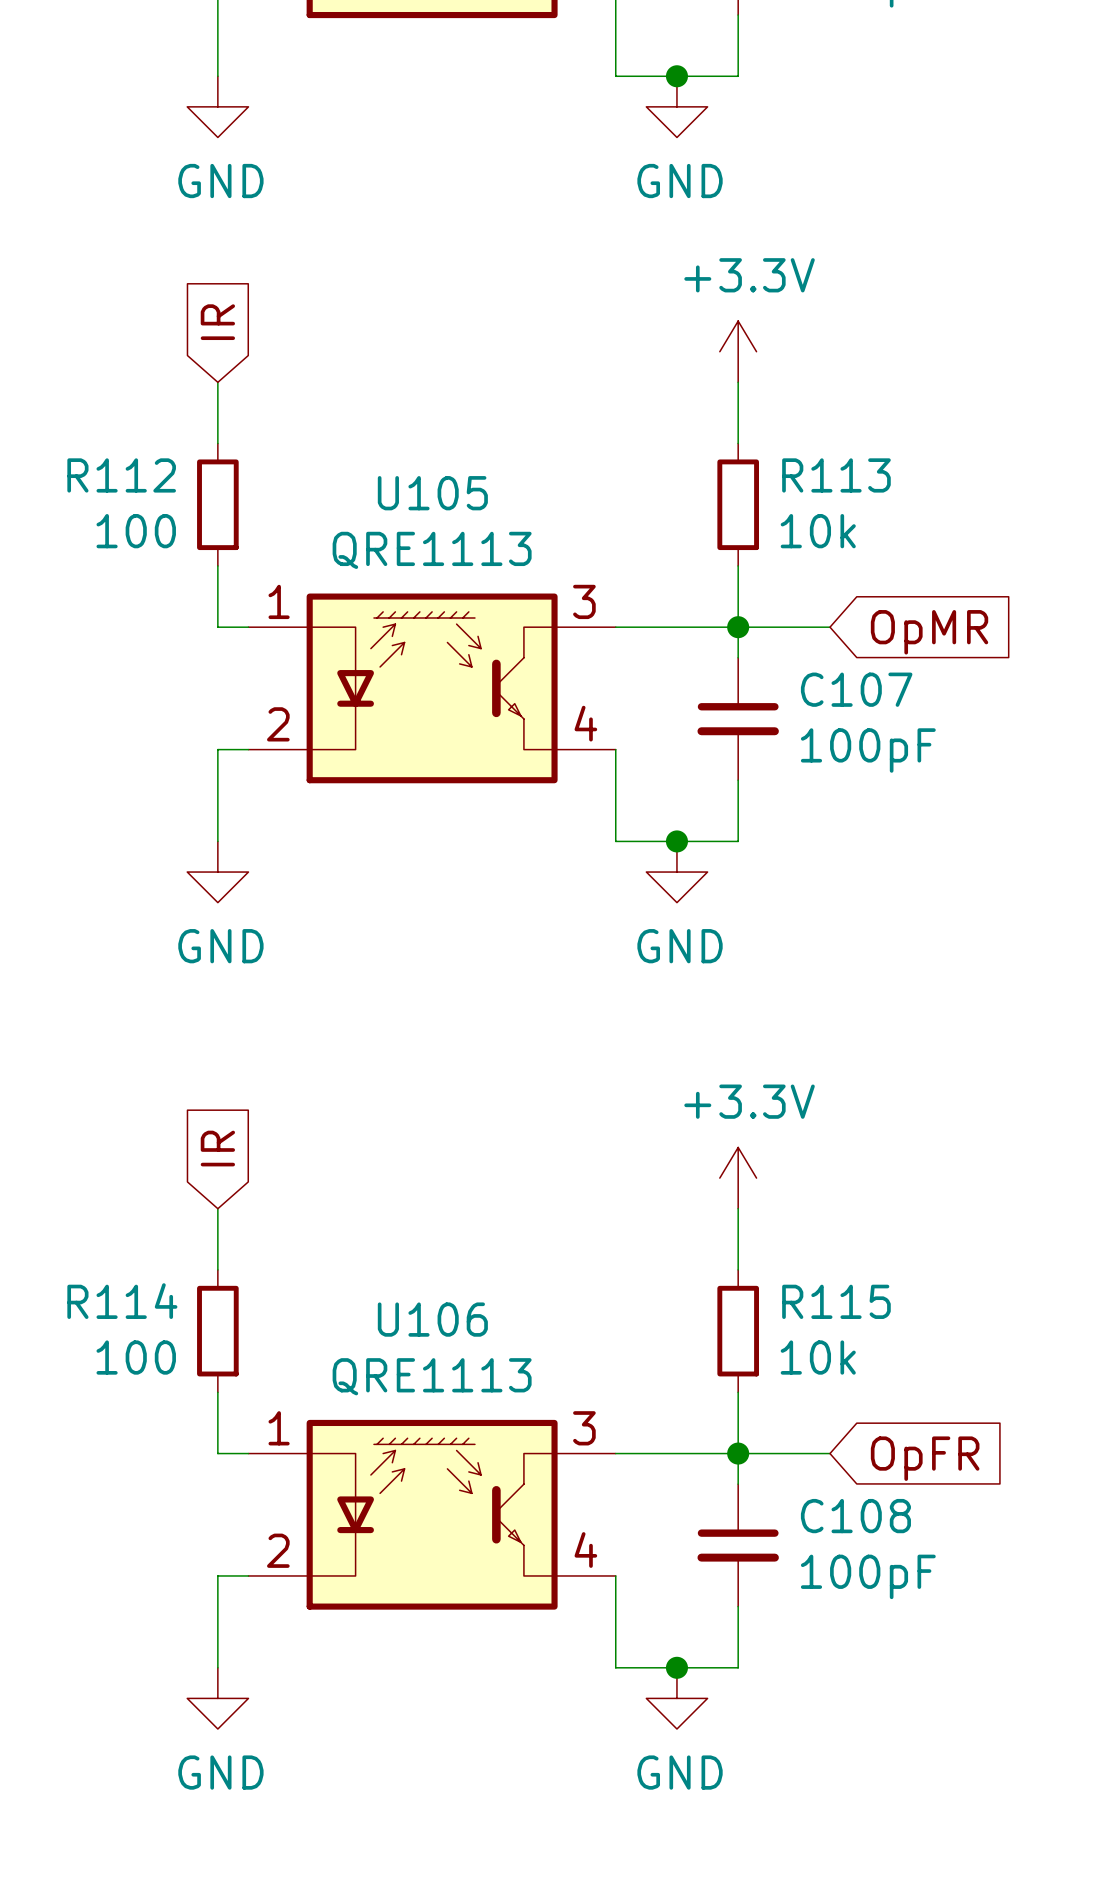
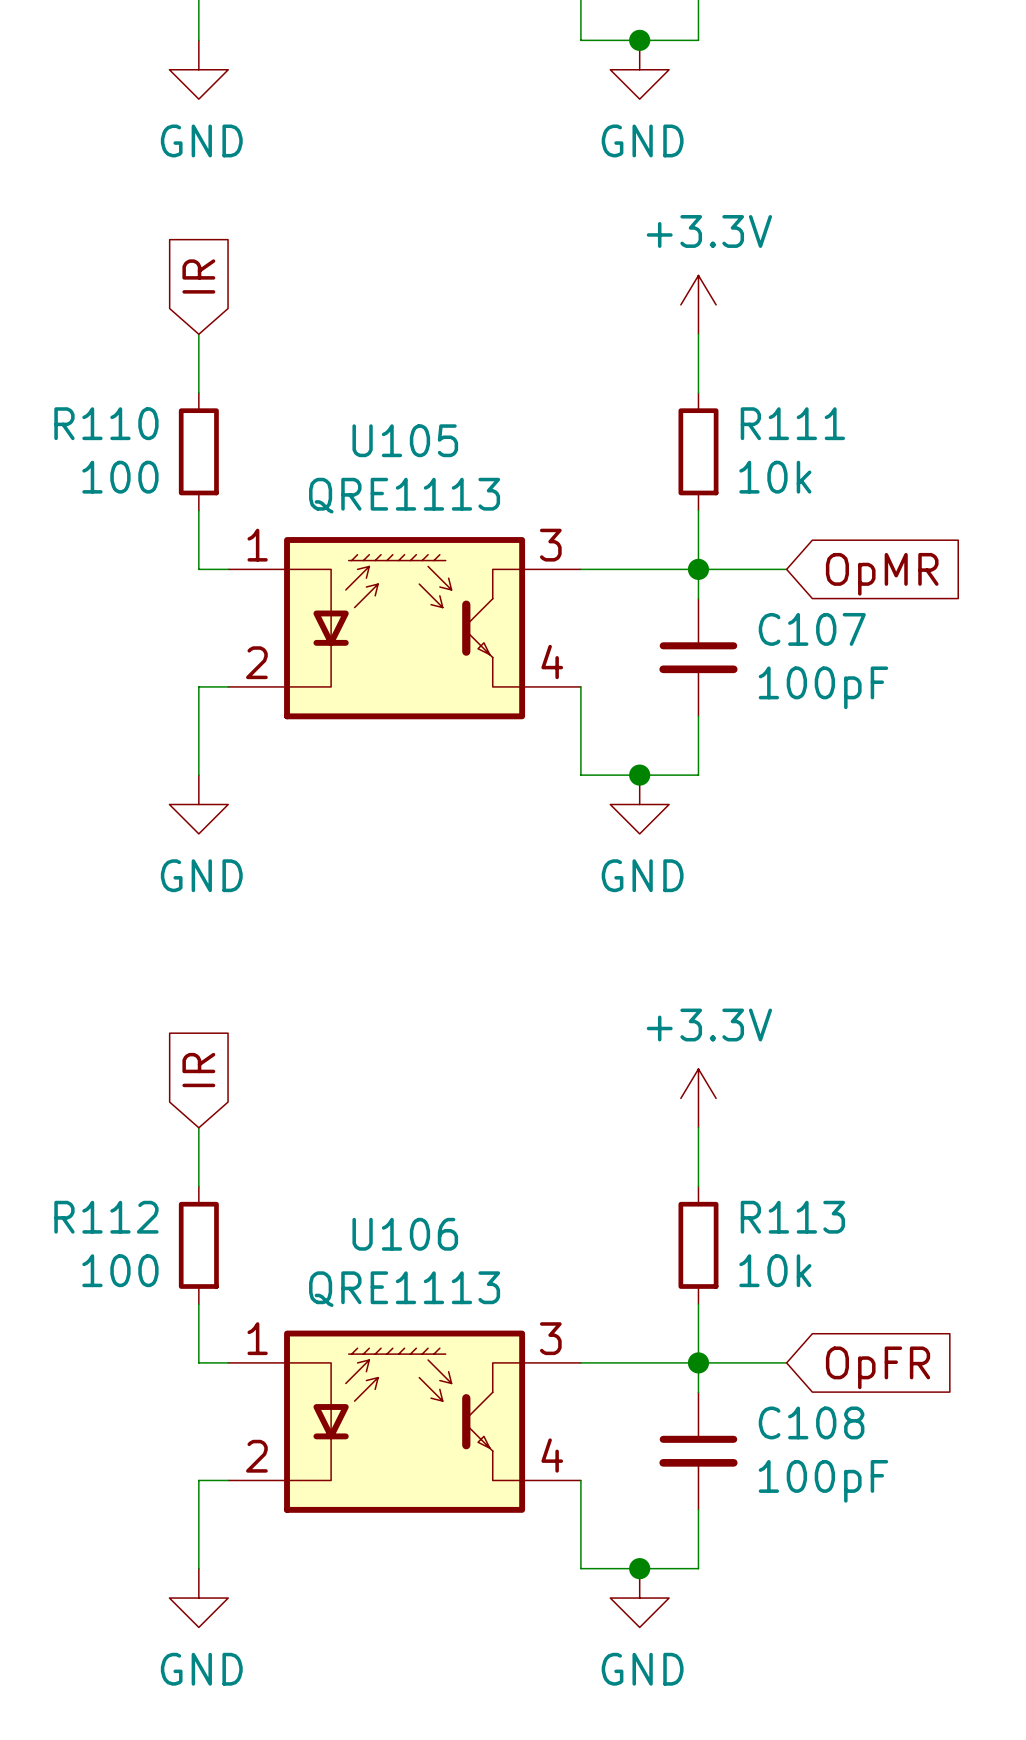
R112 name: R112 (121, 475) -> R110 (106, 423)
R113 name: R113 (836, 475) -> R111 (792, 423)
R114 name: R114 (122, 1301) -> R112 (106, 1217)
R115 name: R115 (836, 1301) -> R113 (792, 1217)

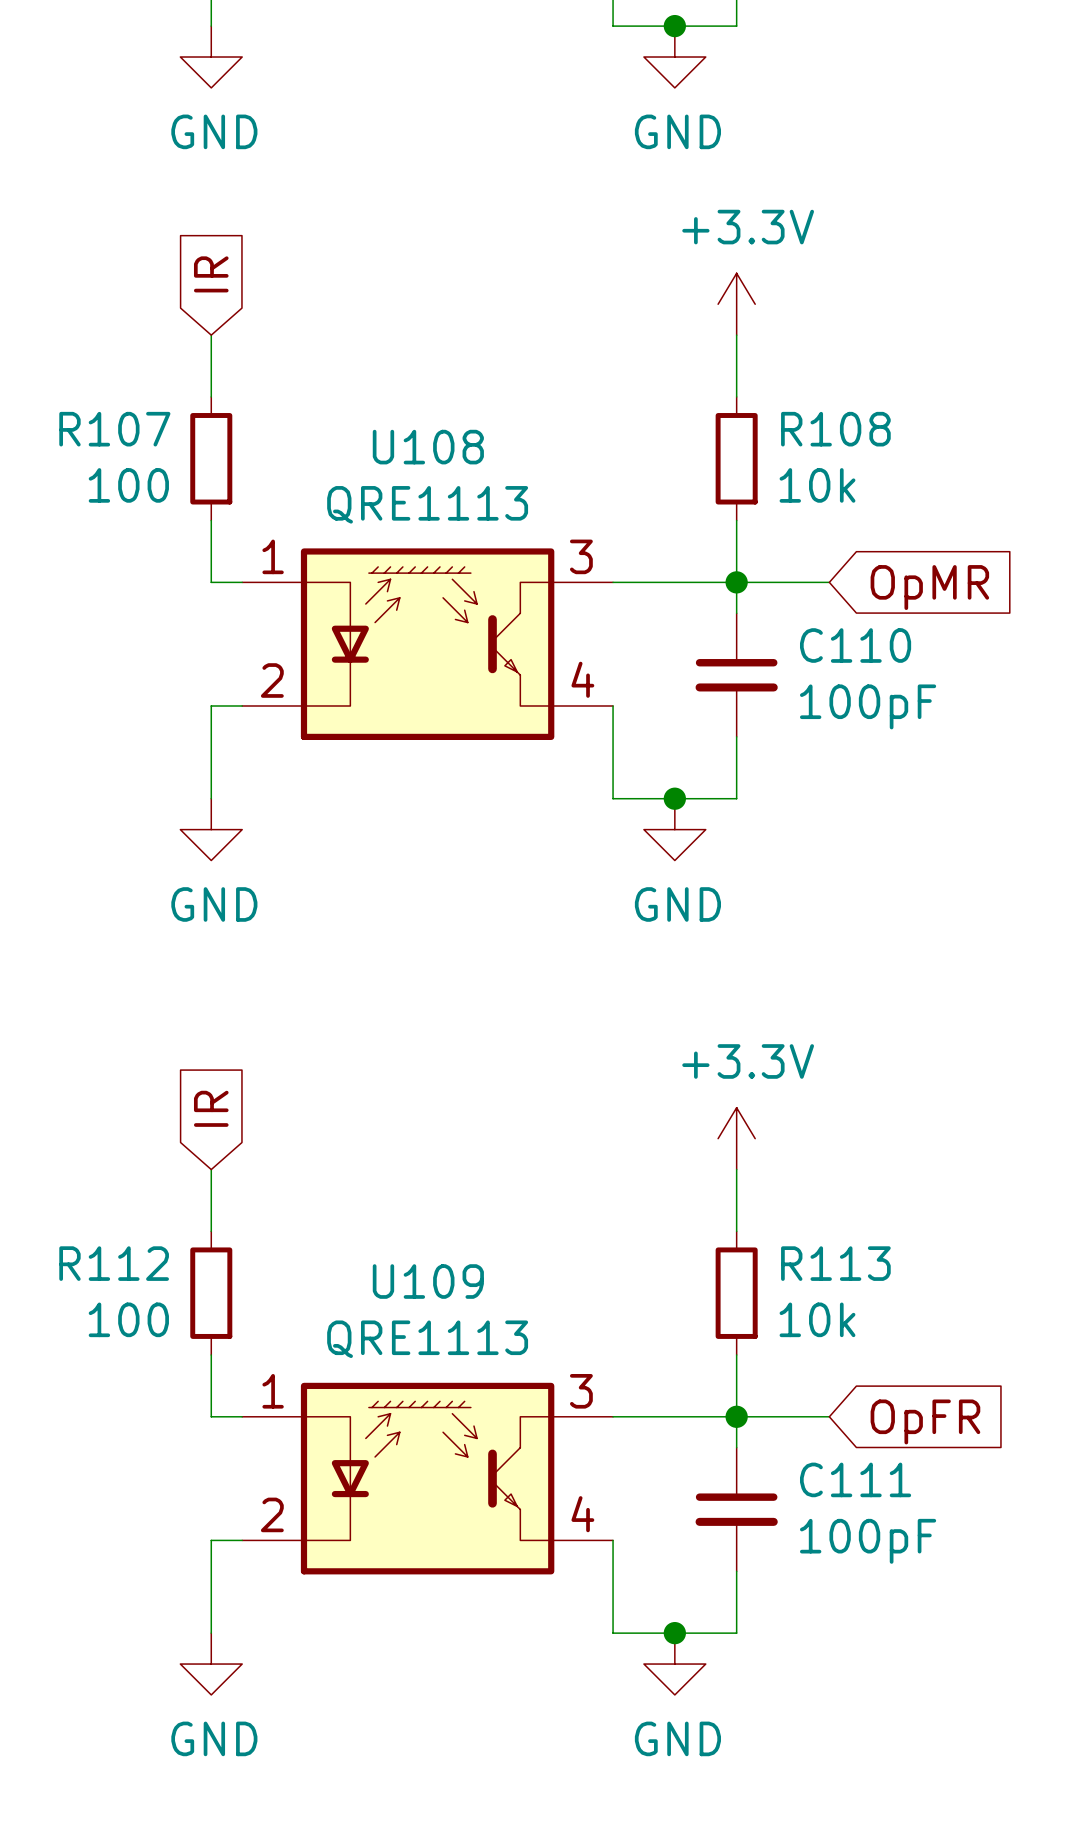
R110 name: R110 (106, 423) -> R107 (114, 429)
R111 name: R111 (792, 423) -> R108 (835, 429)
U105 name: U105 (405, 440) -> U108 (428, 447)
C107 name: C107 (812, 629) -> C110 (855, 645)
U106 name: U106 (405, 1234) -> U109 (428, 1281)
C108 name: C108 (811, 1422) -> C111 (855, 1479)

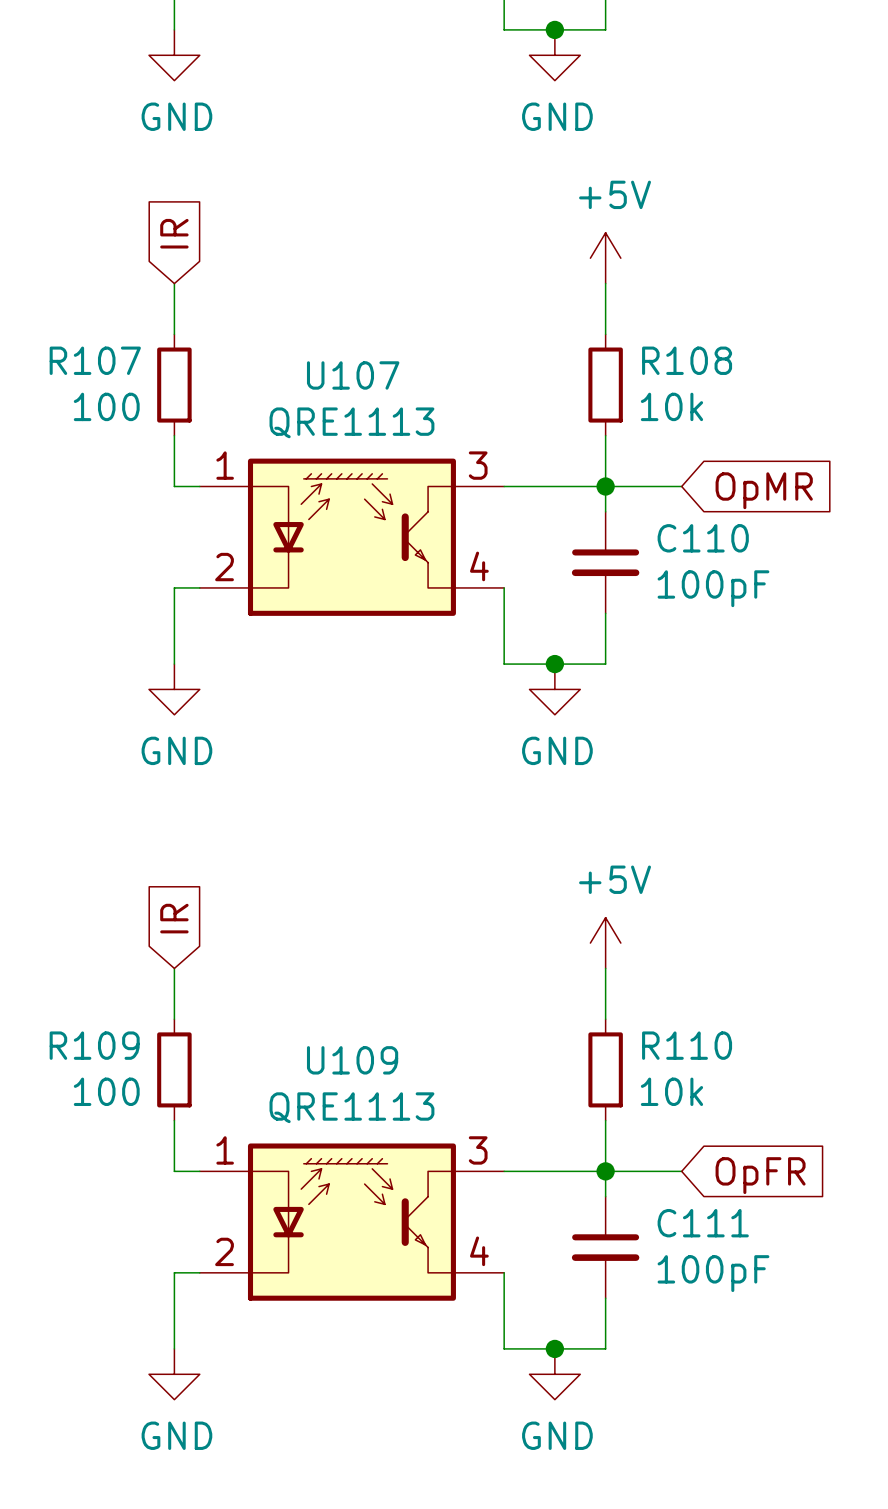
power symbol: +3.3V (736, 304) -> +5V (605, 258)
U108 name: U108 (428, 447) -> U107 (353, 375)
power symbol: +3.3V (736, 1138) -> +5V (605, 943)
R112 name: R112 (114, 1263) -> R109 (94, 1045)
R113 name: R113 (835, 1263) -> R110 (687, 1045)

